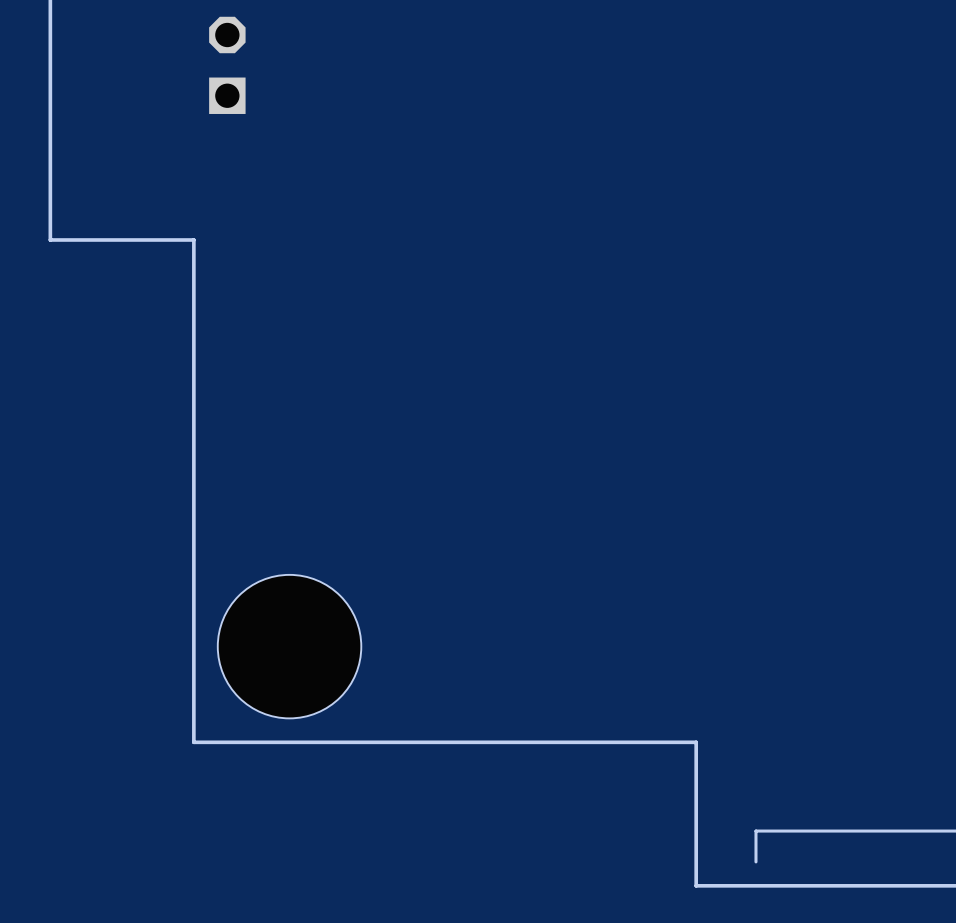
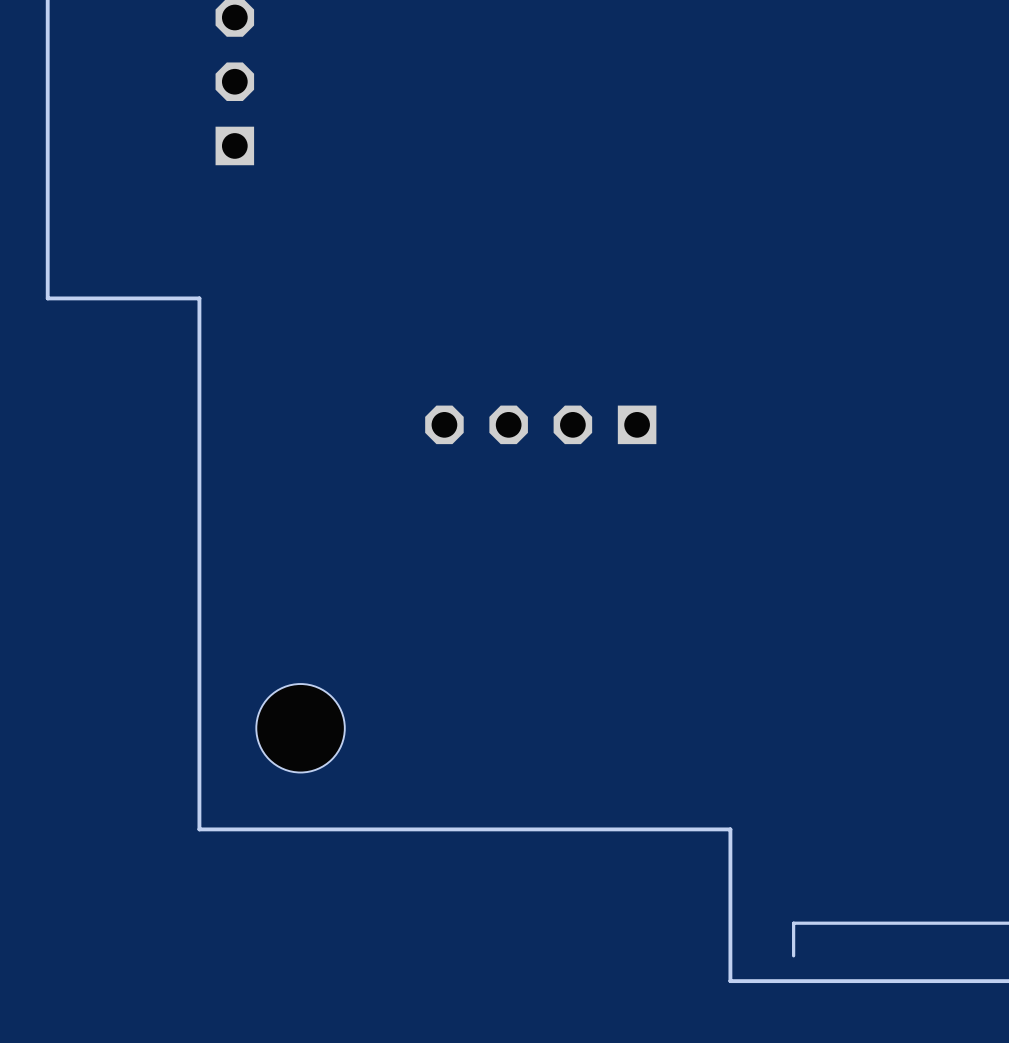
part: none -> (540, 424)
hole size: [217, 574, 362, 719] -> [256, 684, 345, 773]

